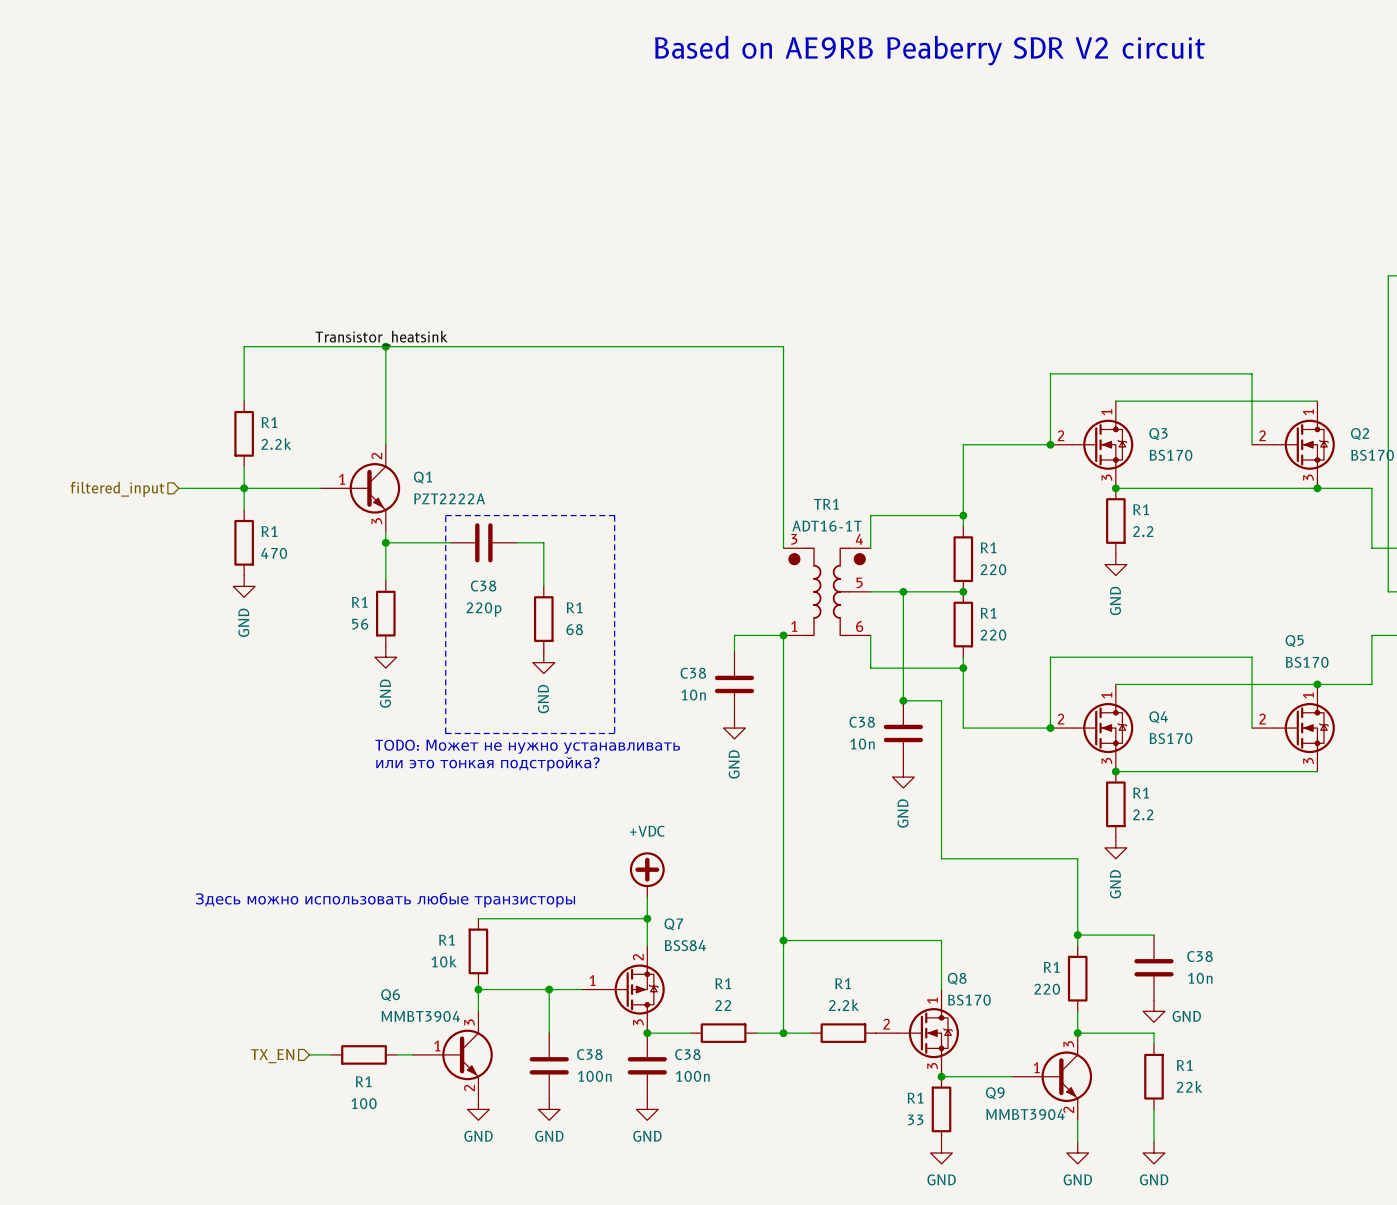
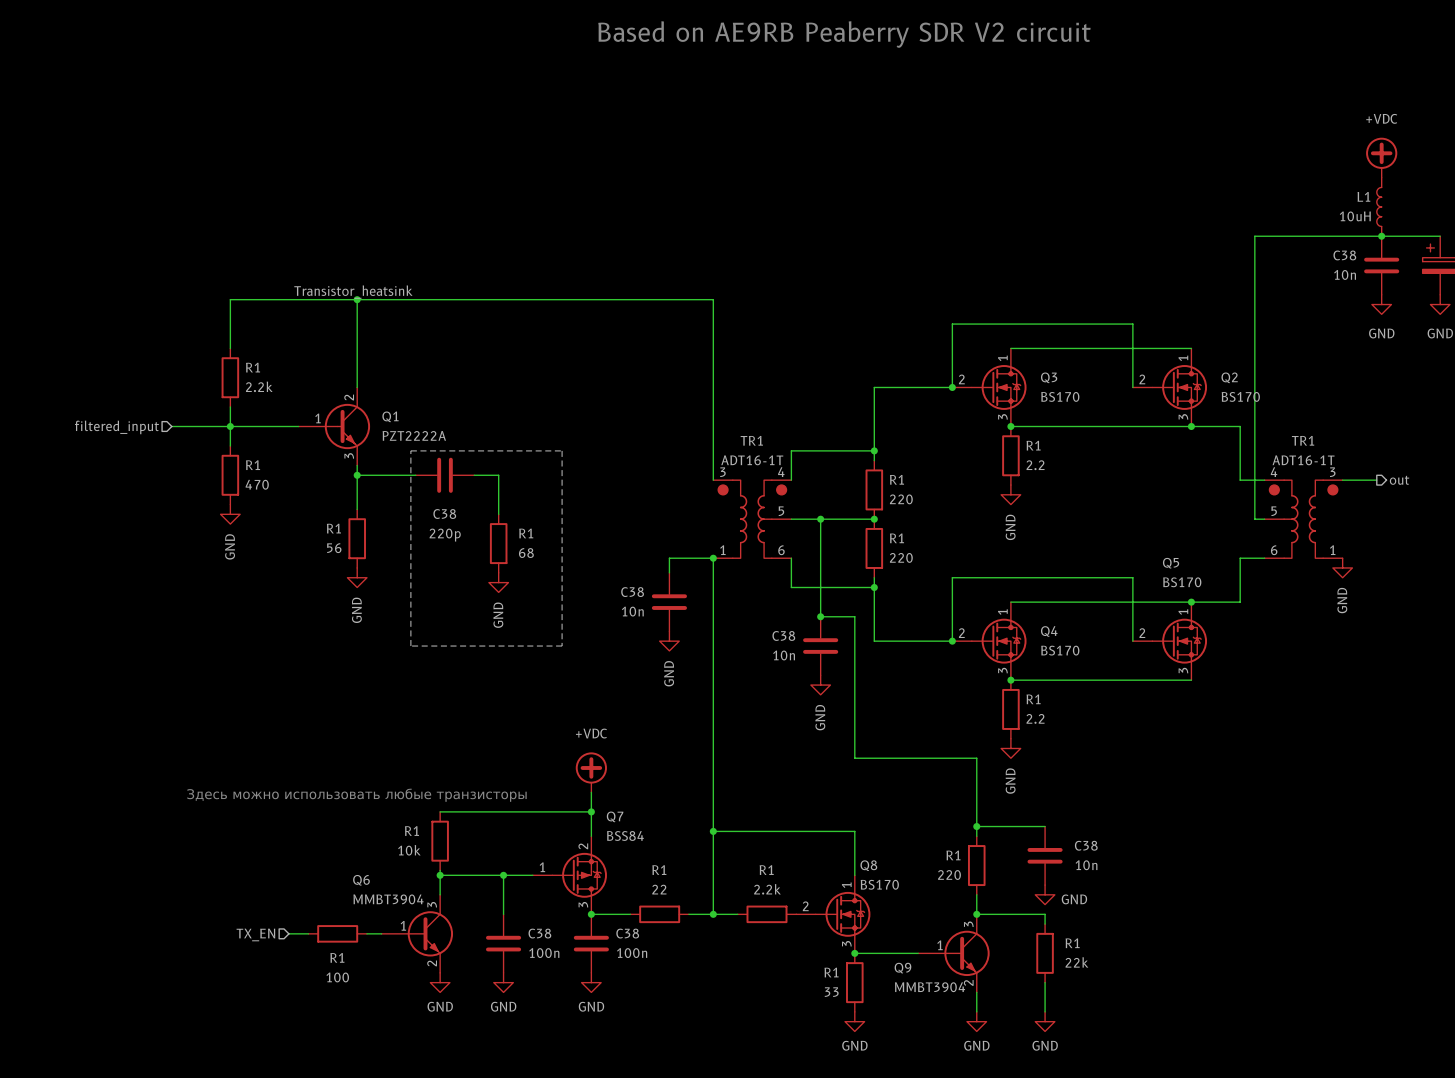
text: TODO: Может не нужно устанавливать (527, 746) -> none
text: или это тонкая подстройка? (487, 764) -> none

